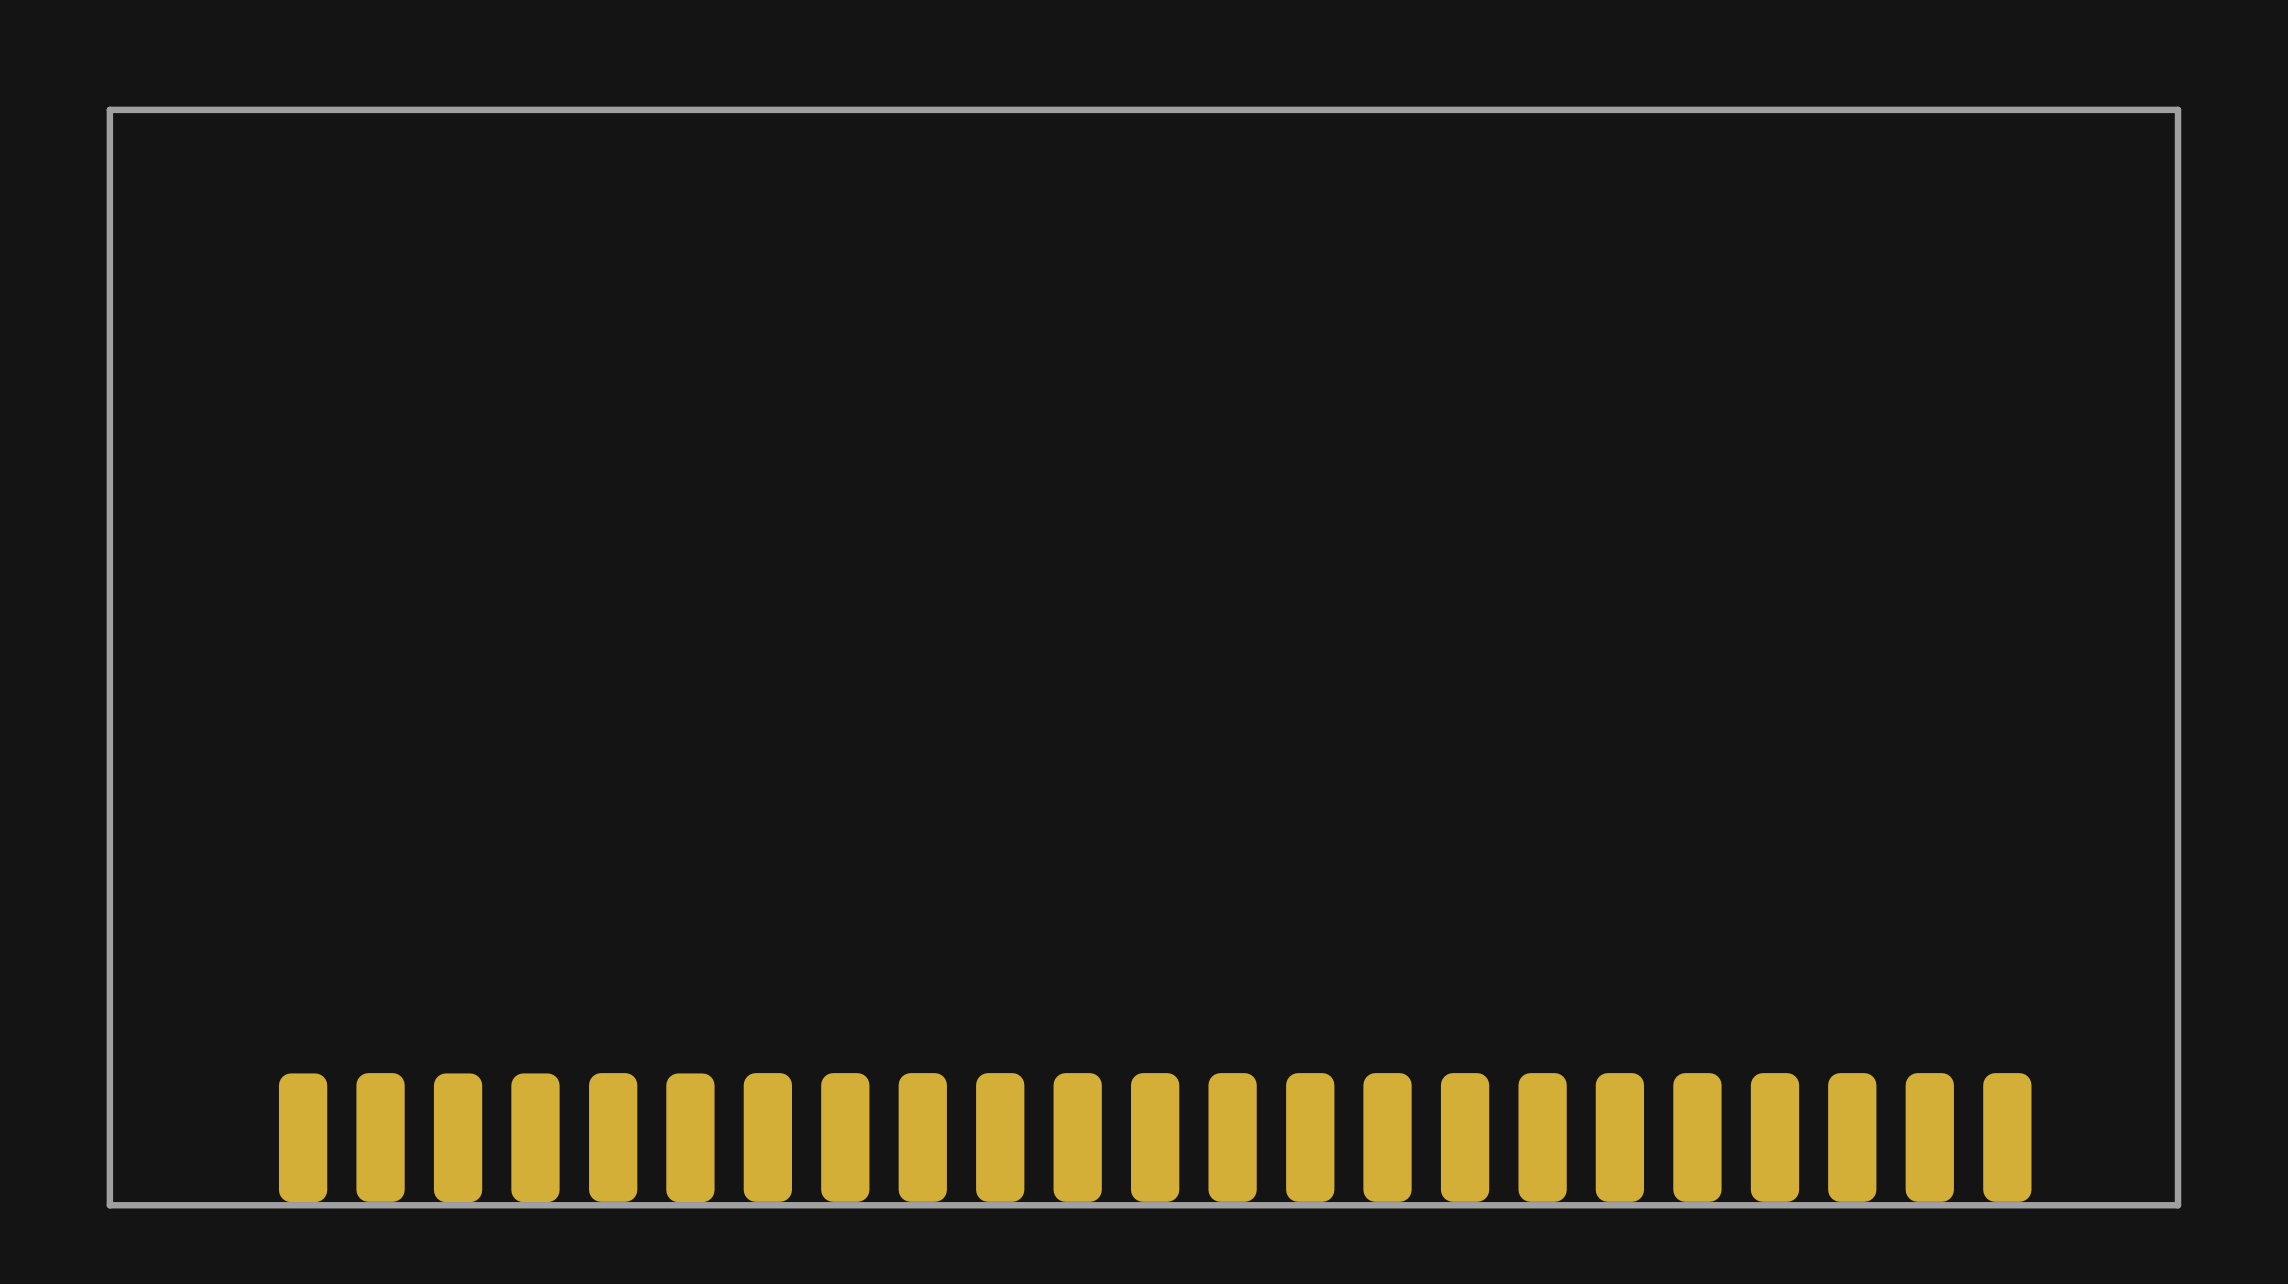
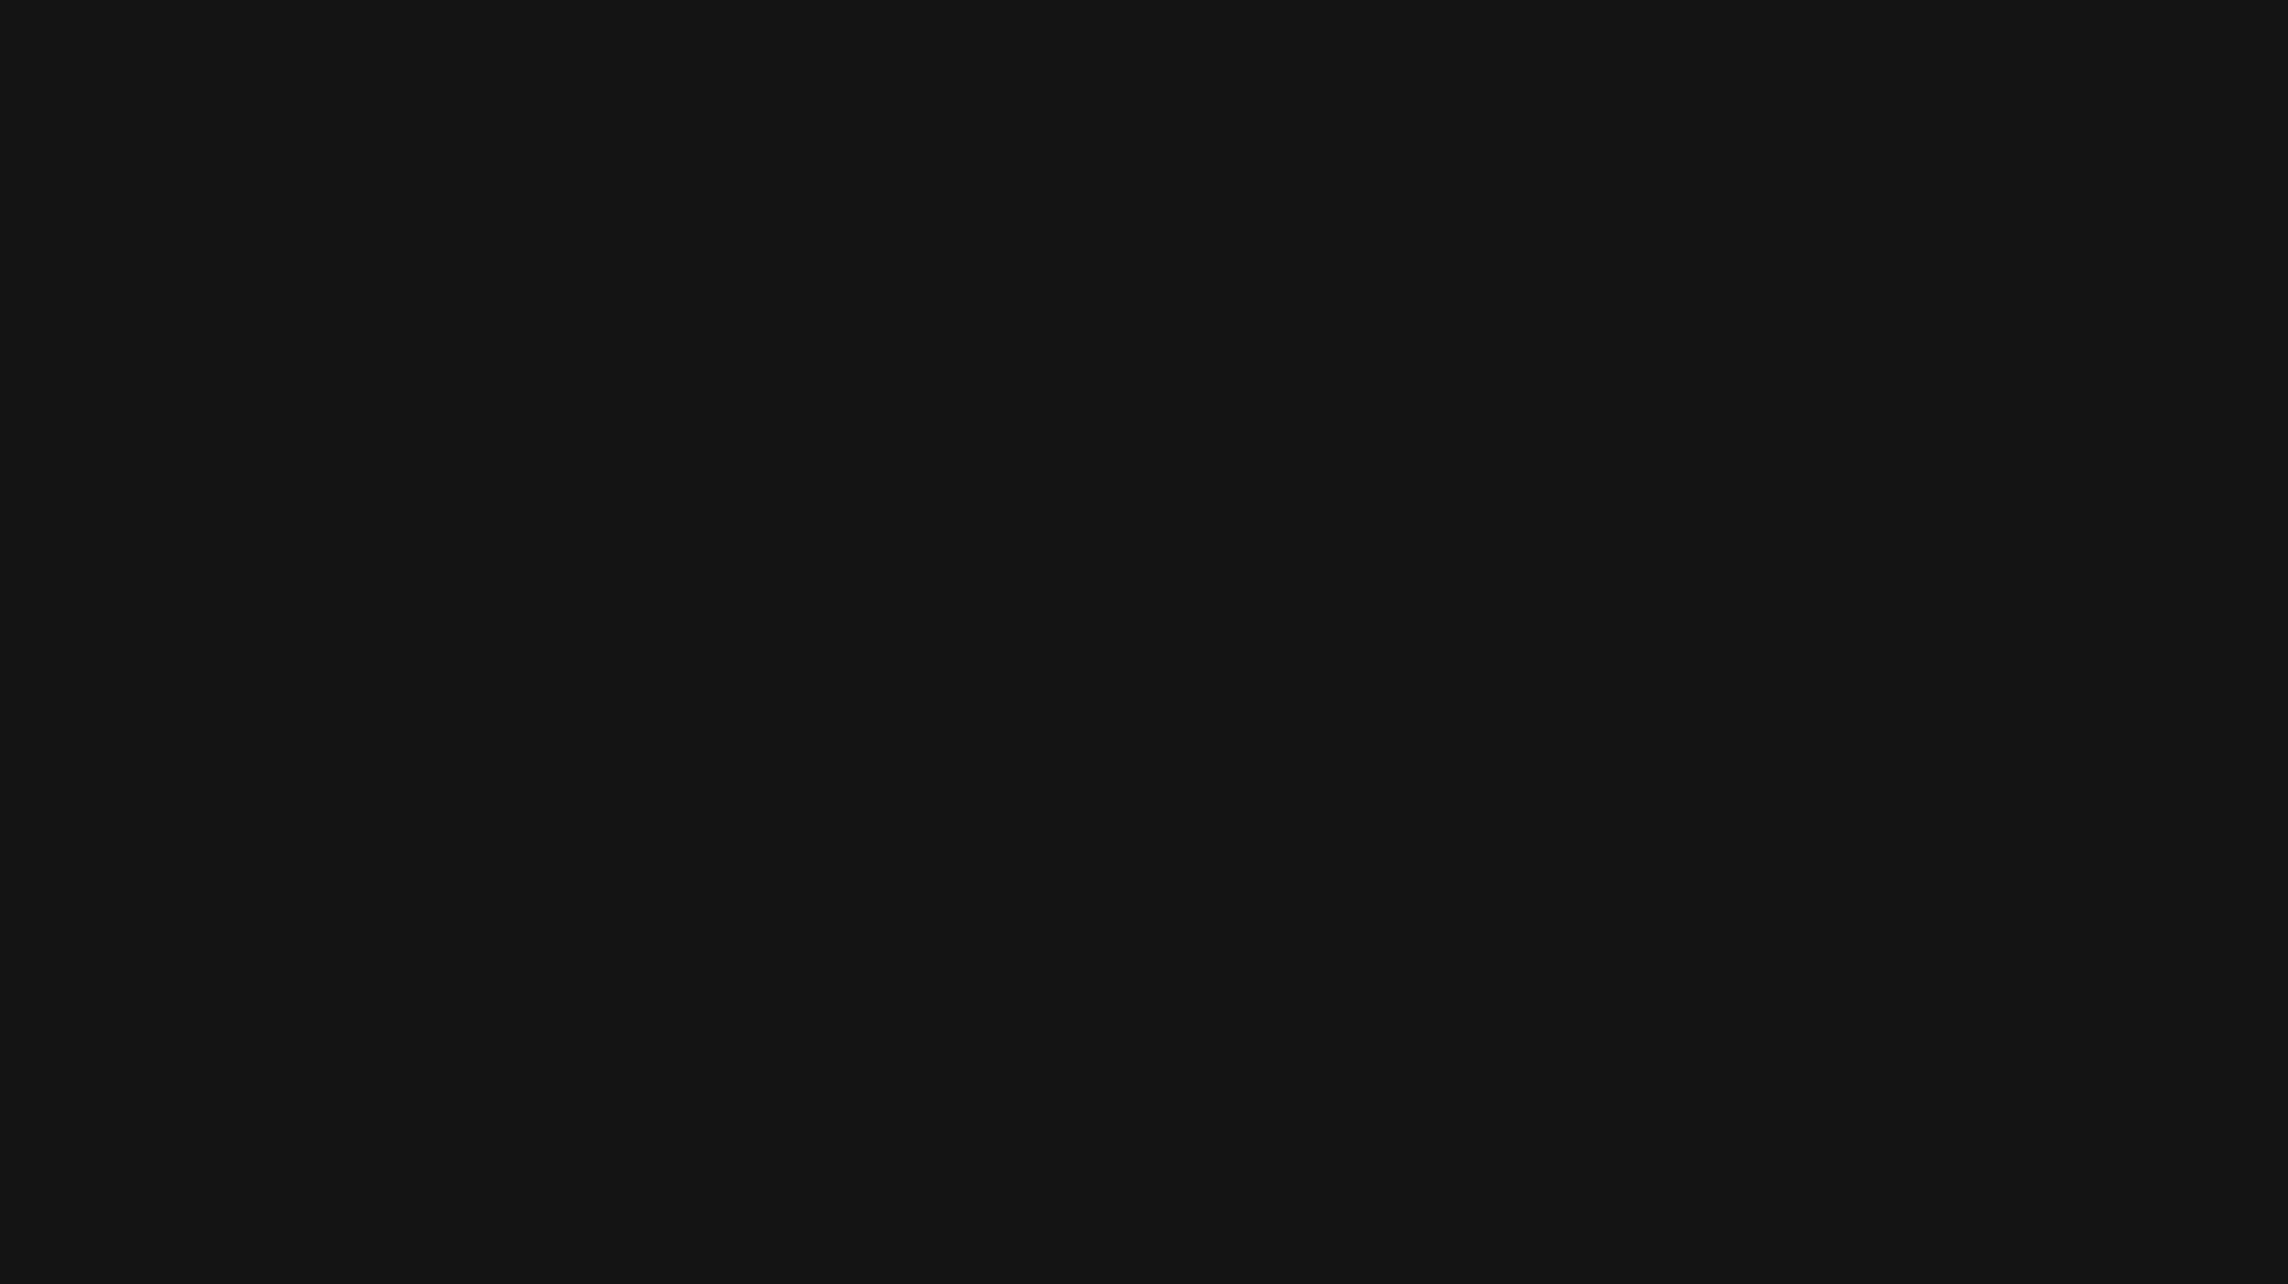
board edge: (2178, 109) (109, 109) (109, 1205) (2178, 1205) (2178, 109) -> none
part: (1155, 1137) -> none

